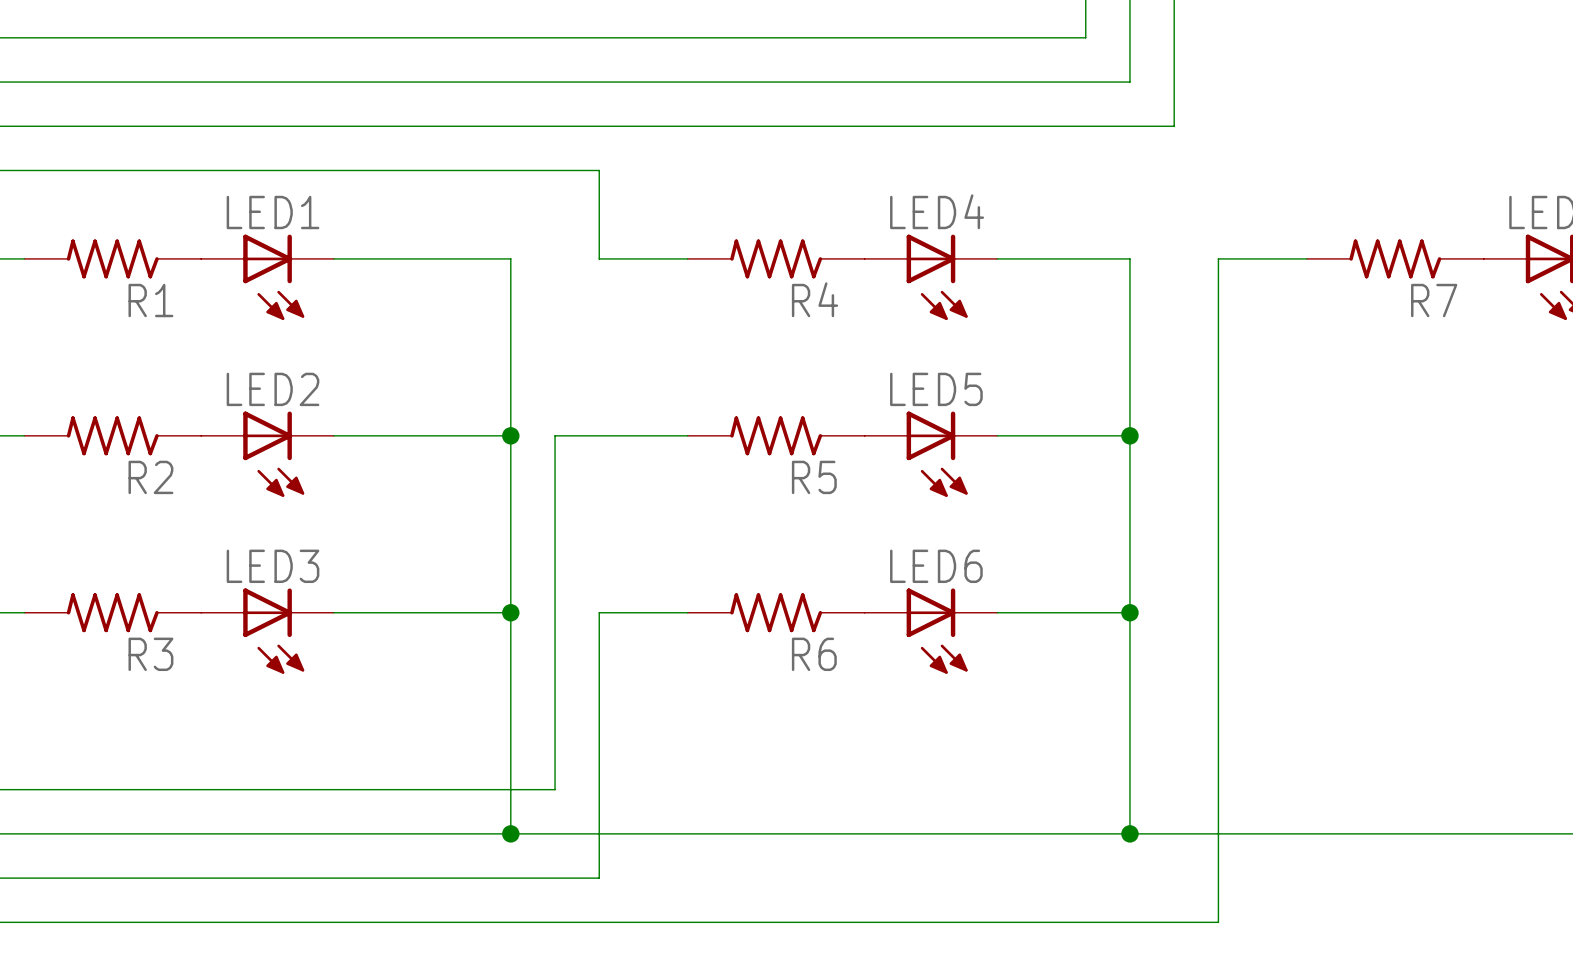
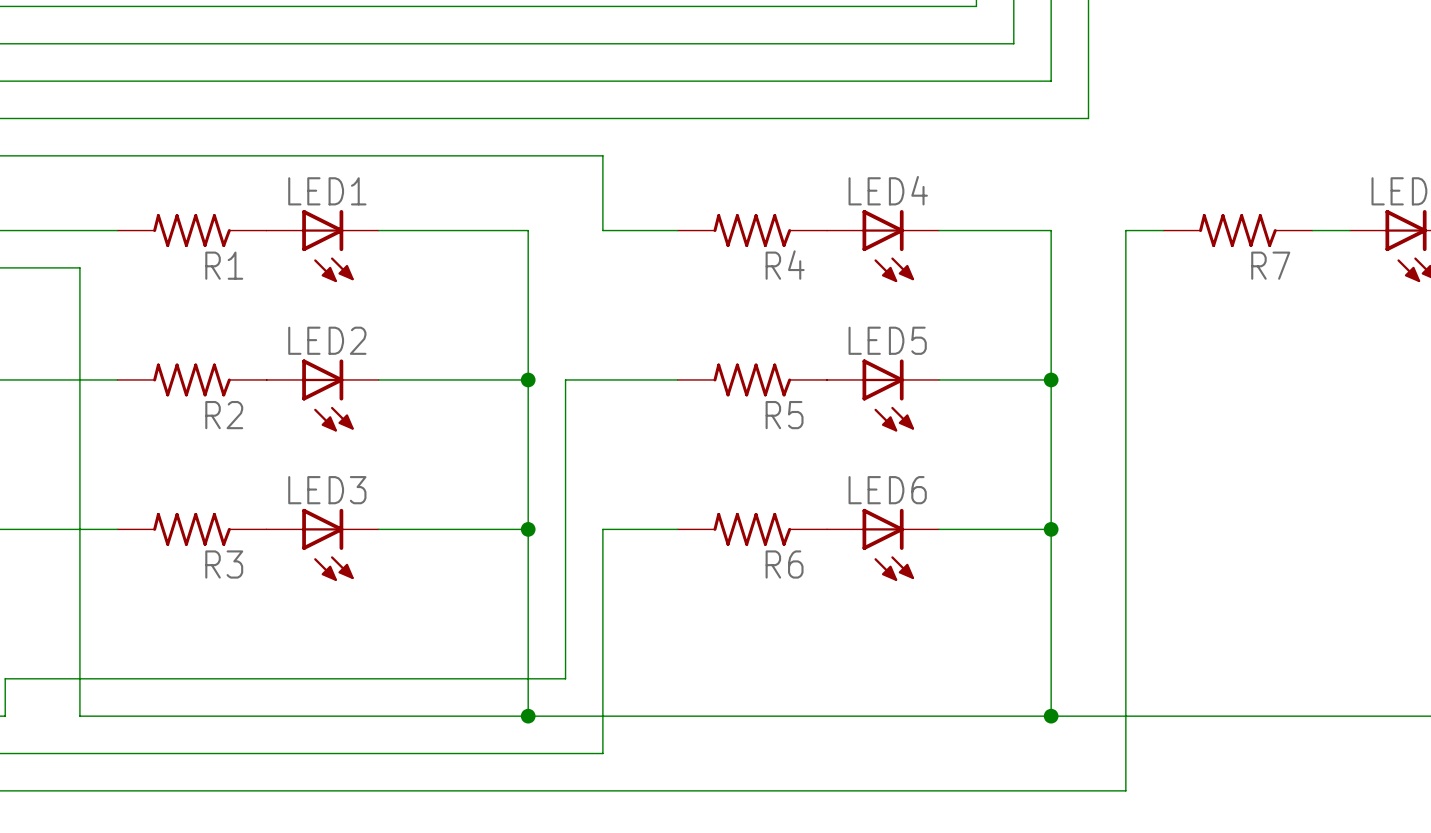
R7 position: (1395, 258) -> (1237, 230)

